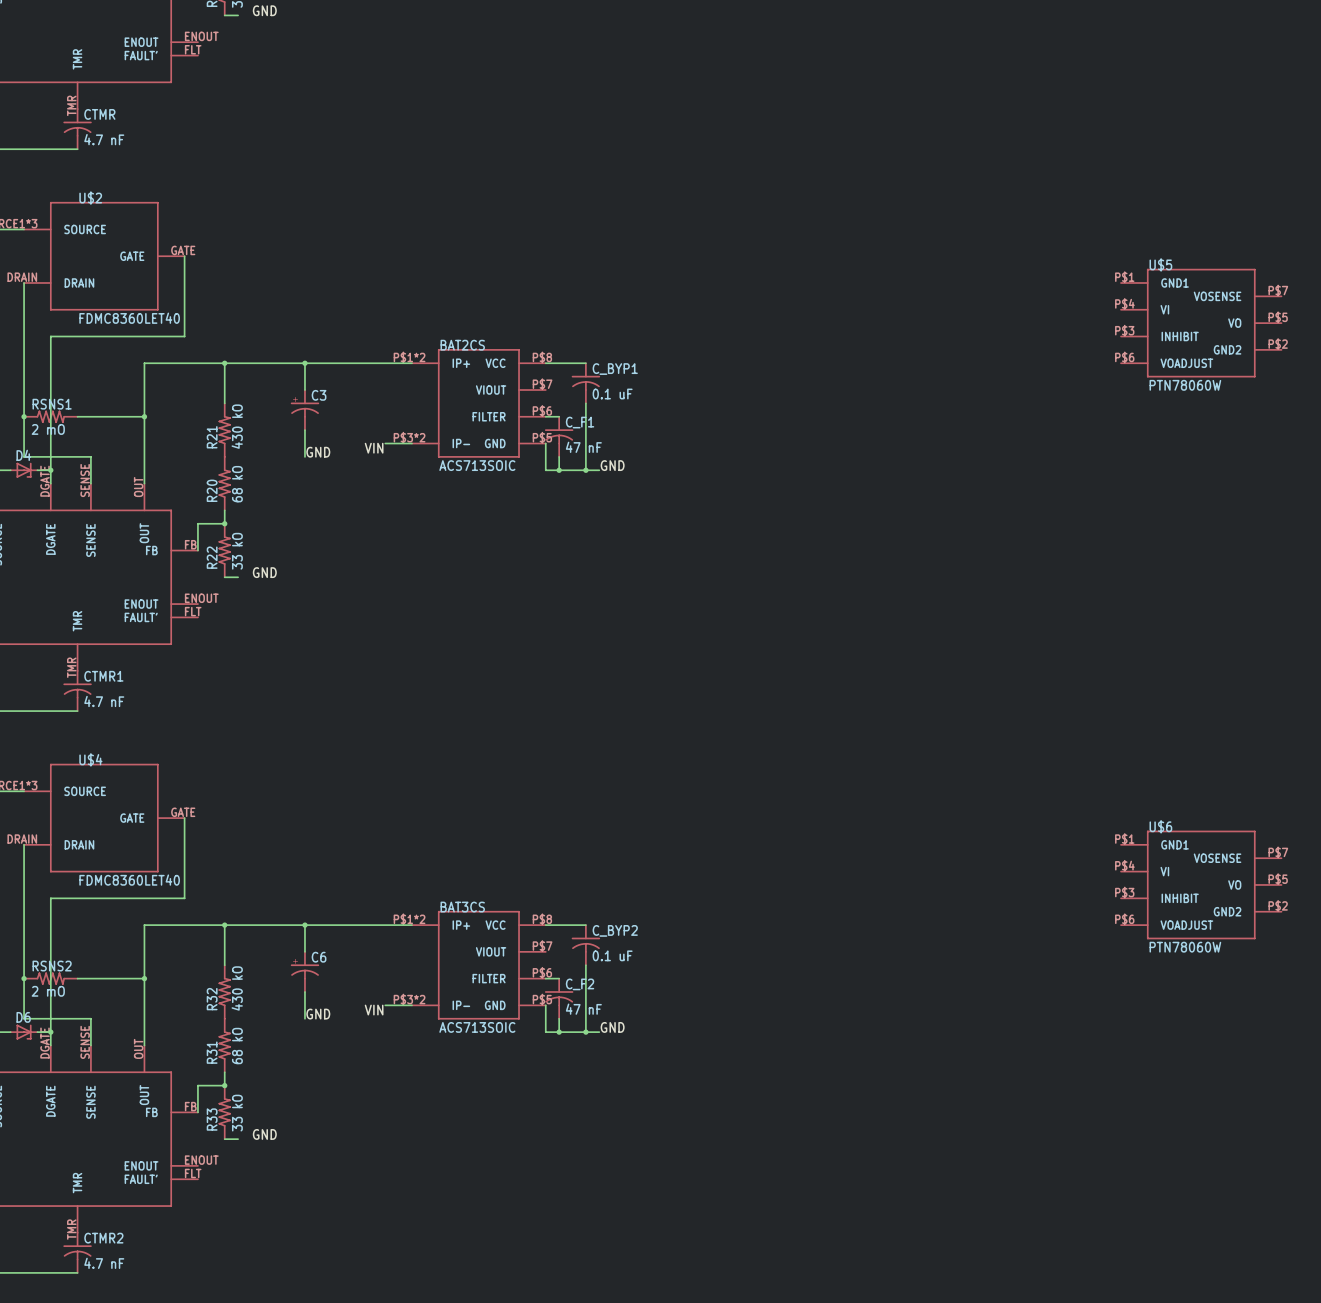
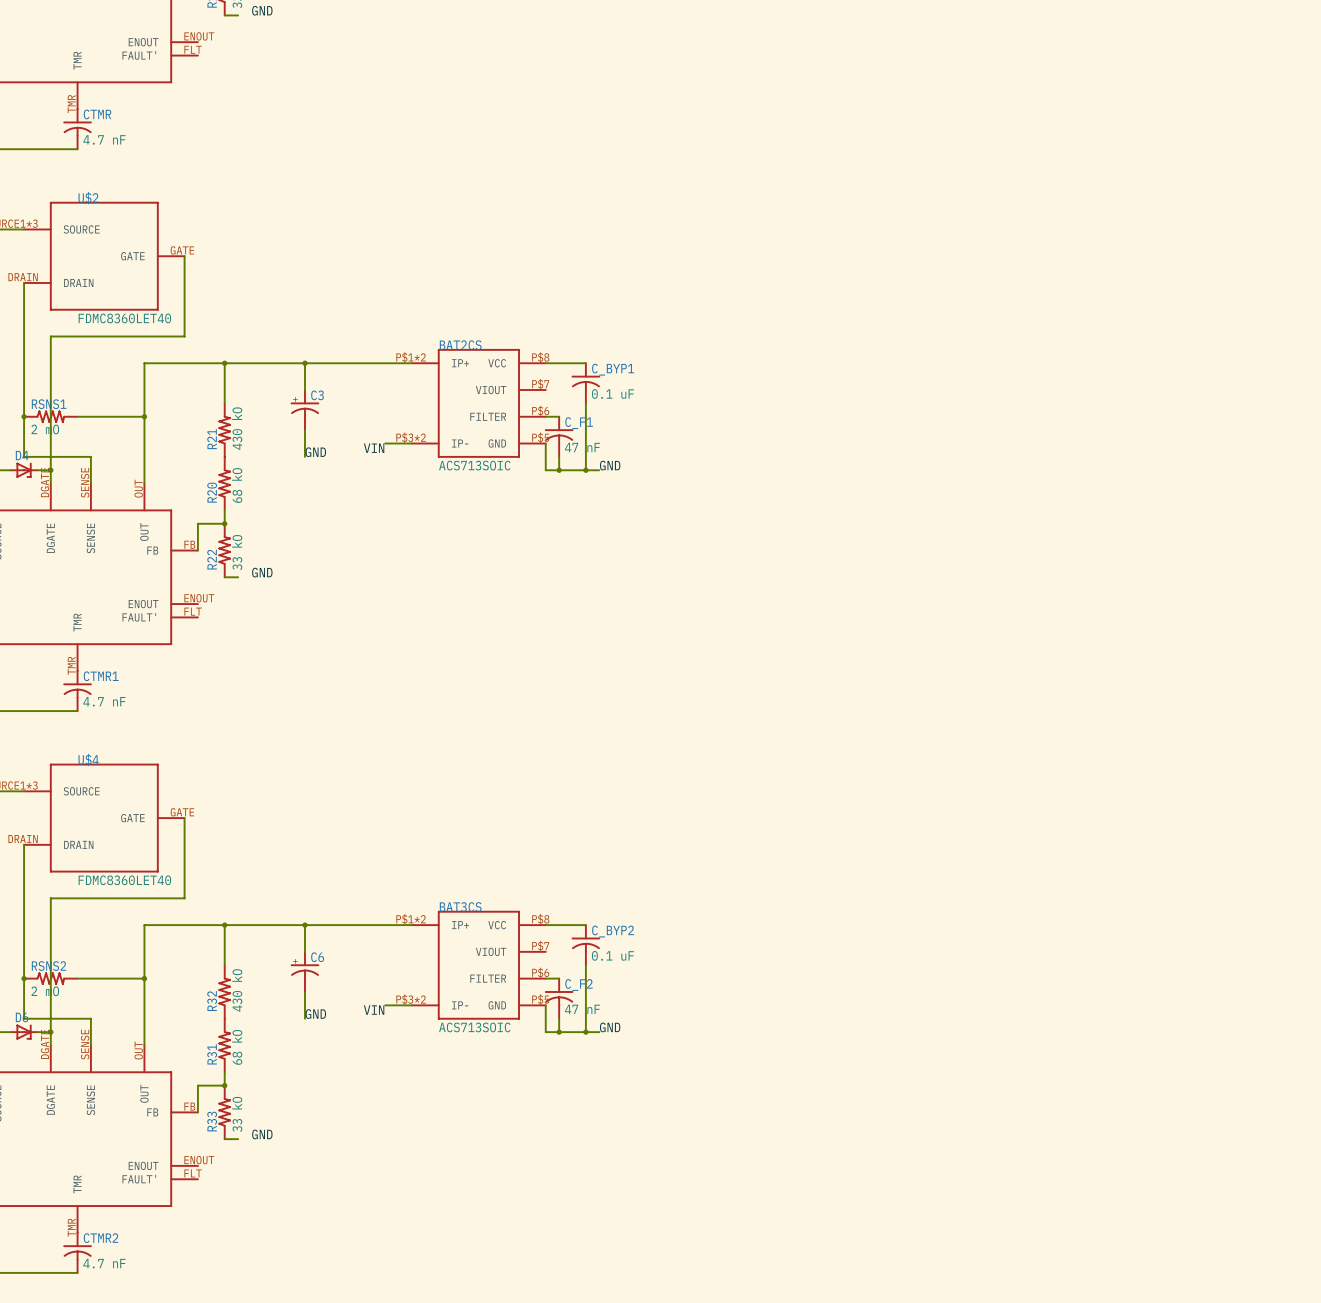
U$5: PTN78060W (1201, 323) -> none
U$6: PTN78060W (1201, 884) -> none

